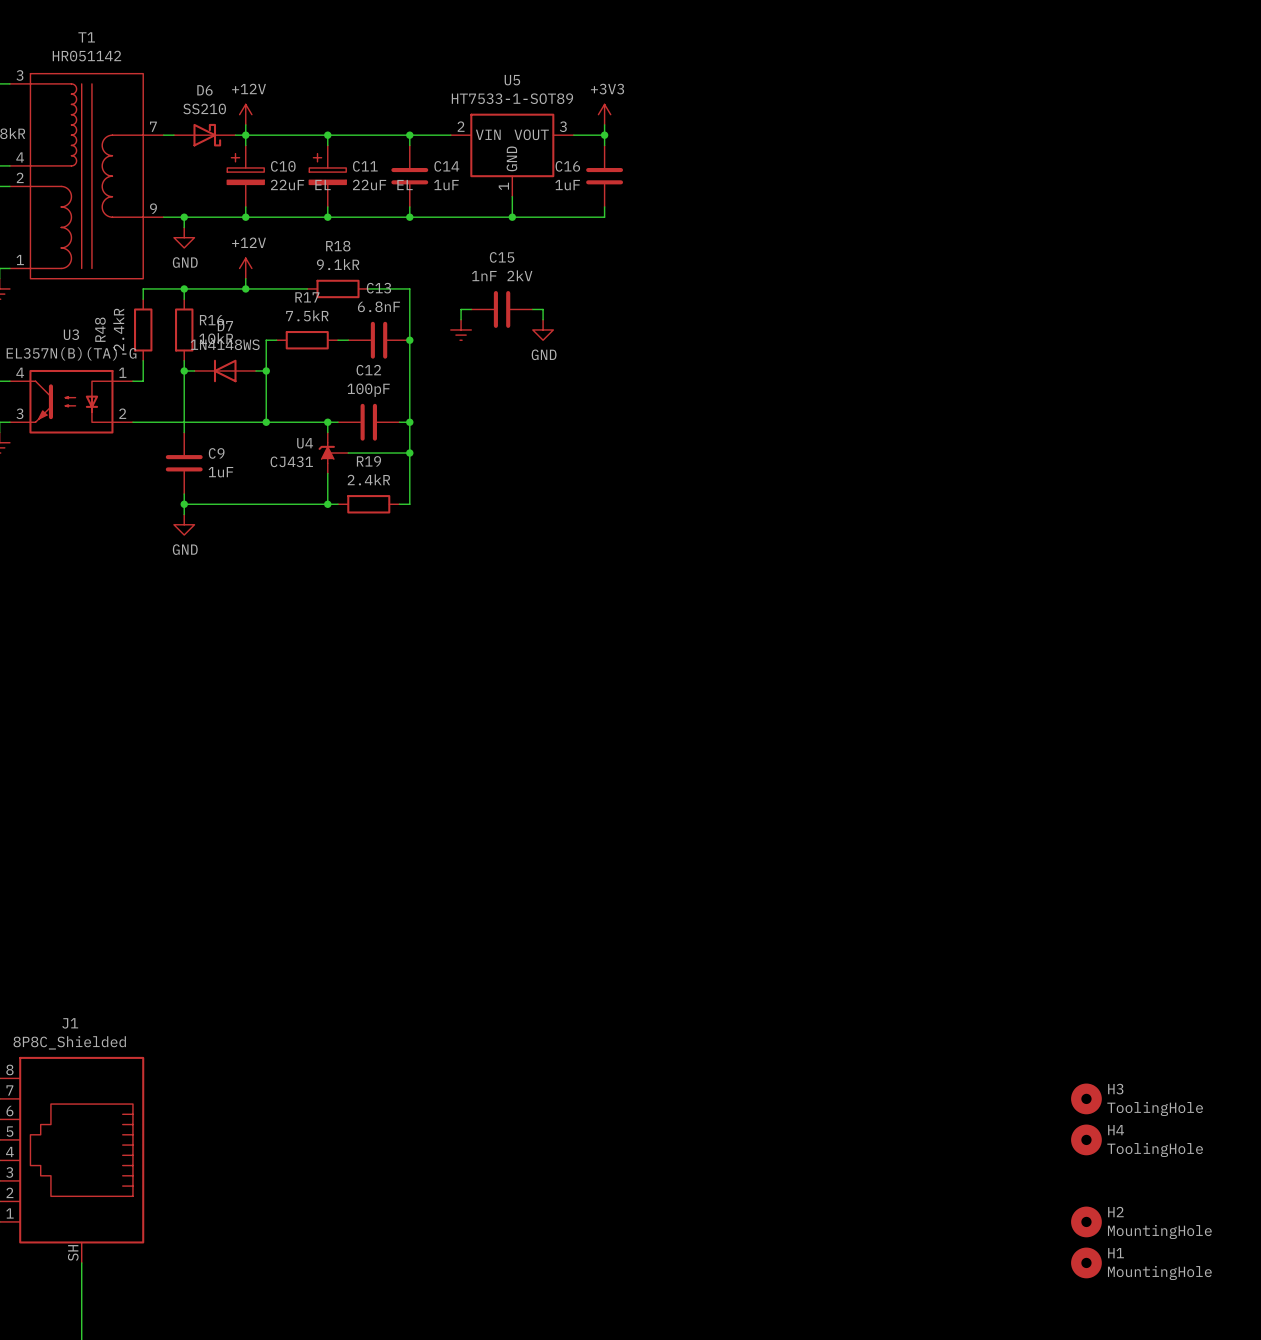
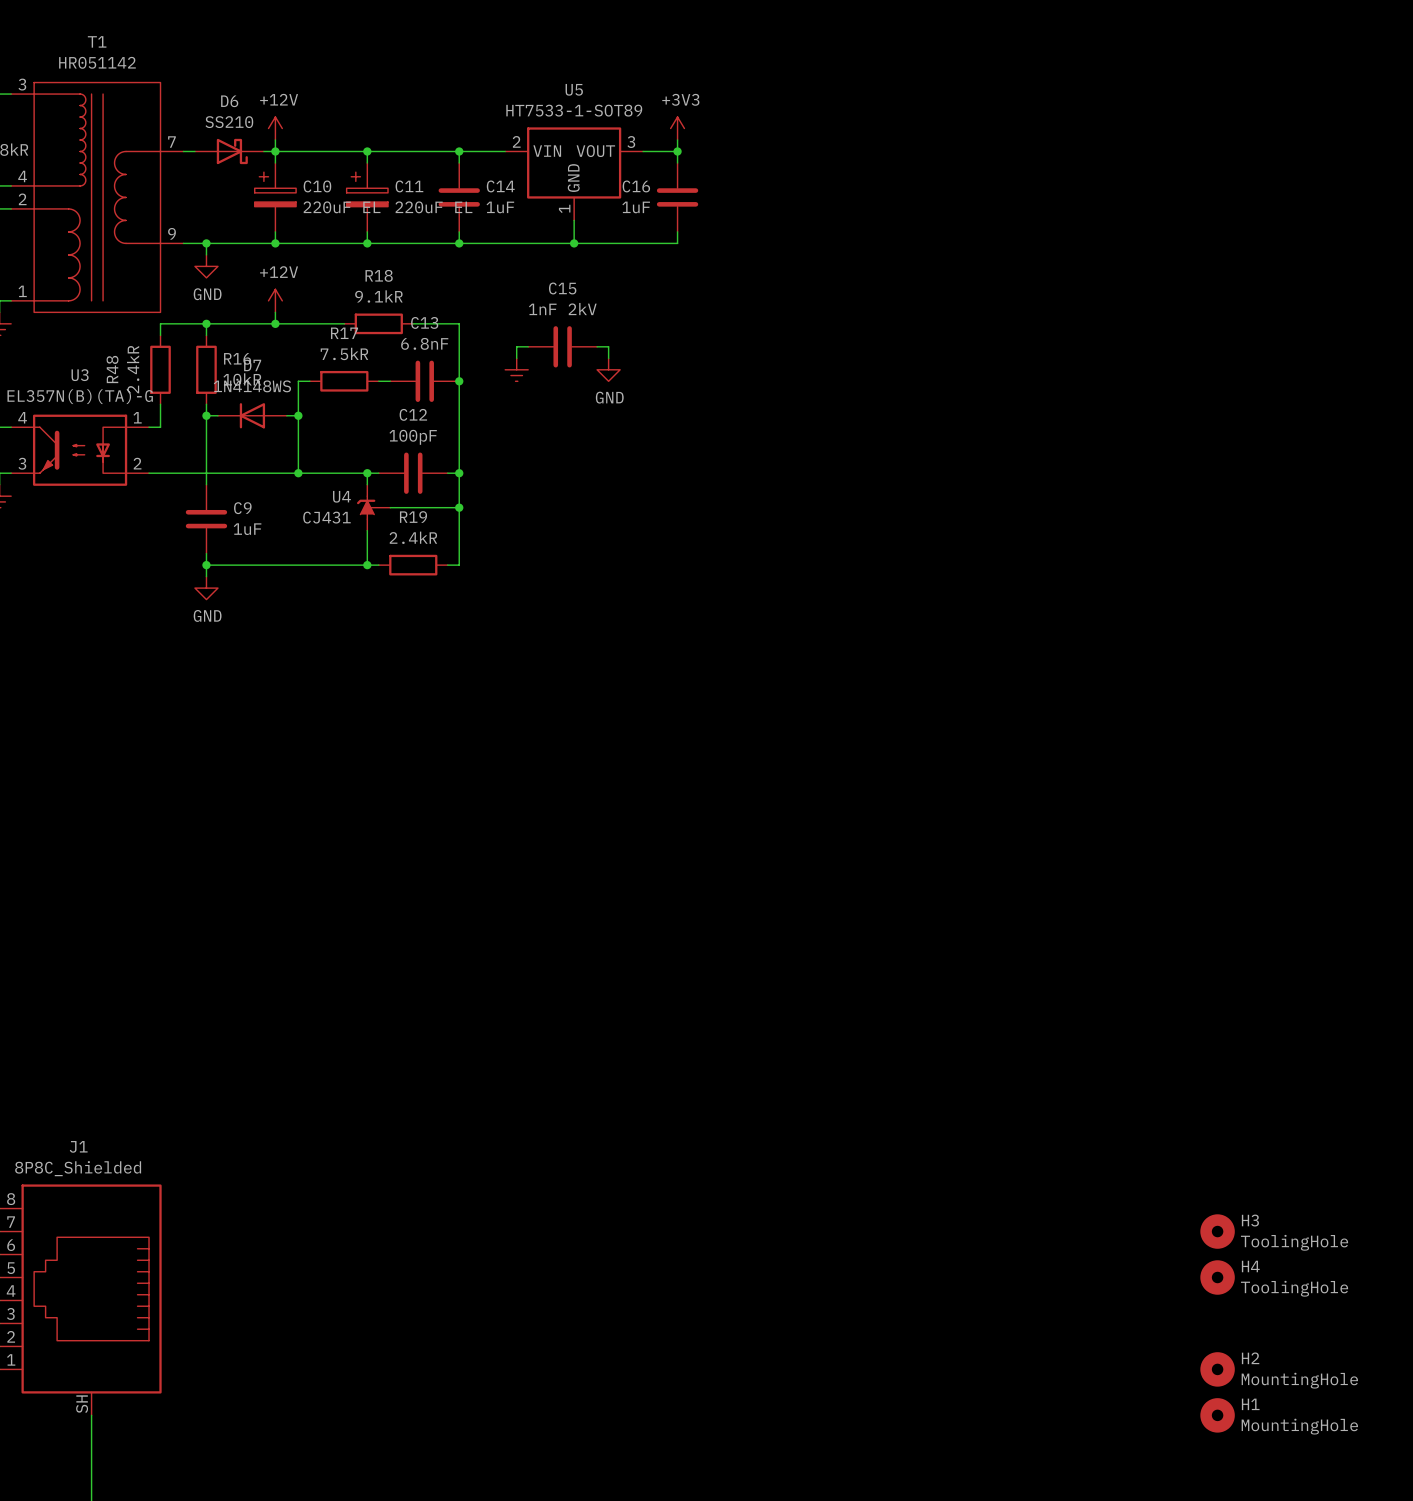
C10 value: 22uF EL (300, 185) -> 220uF EL (342, 207)
C11 value: 22uF EL (382, 185) -> 220uF EL (433, 207)

